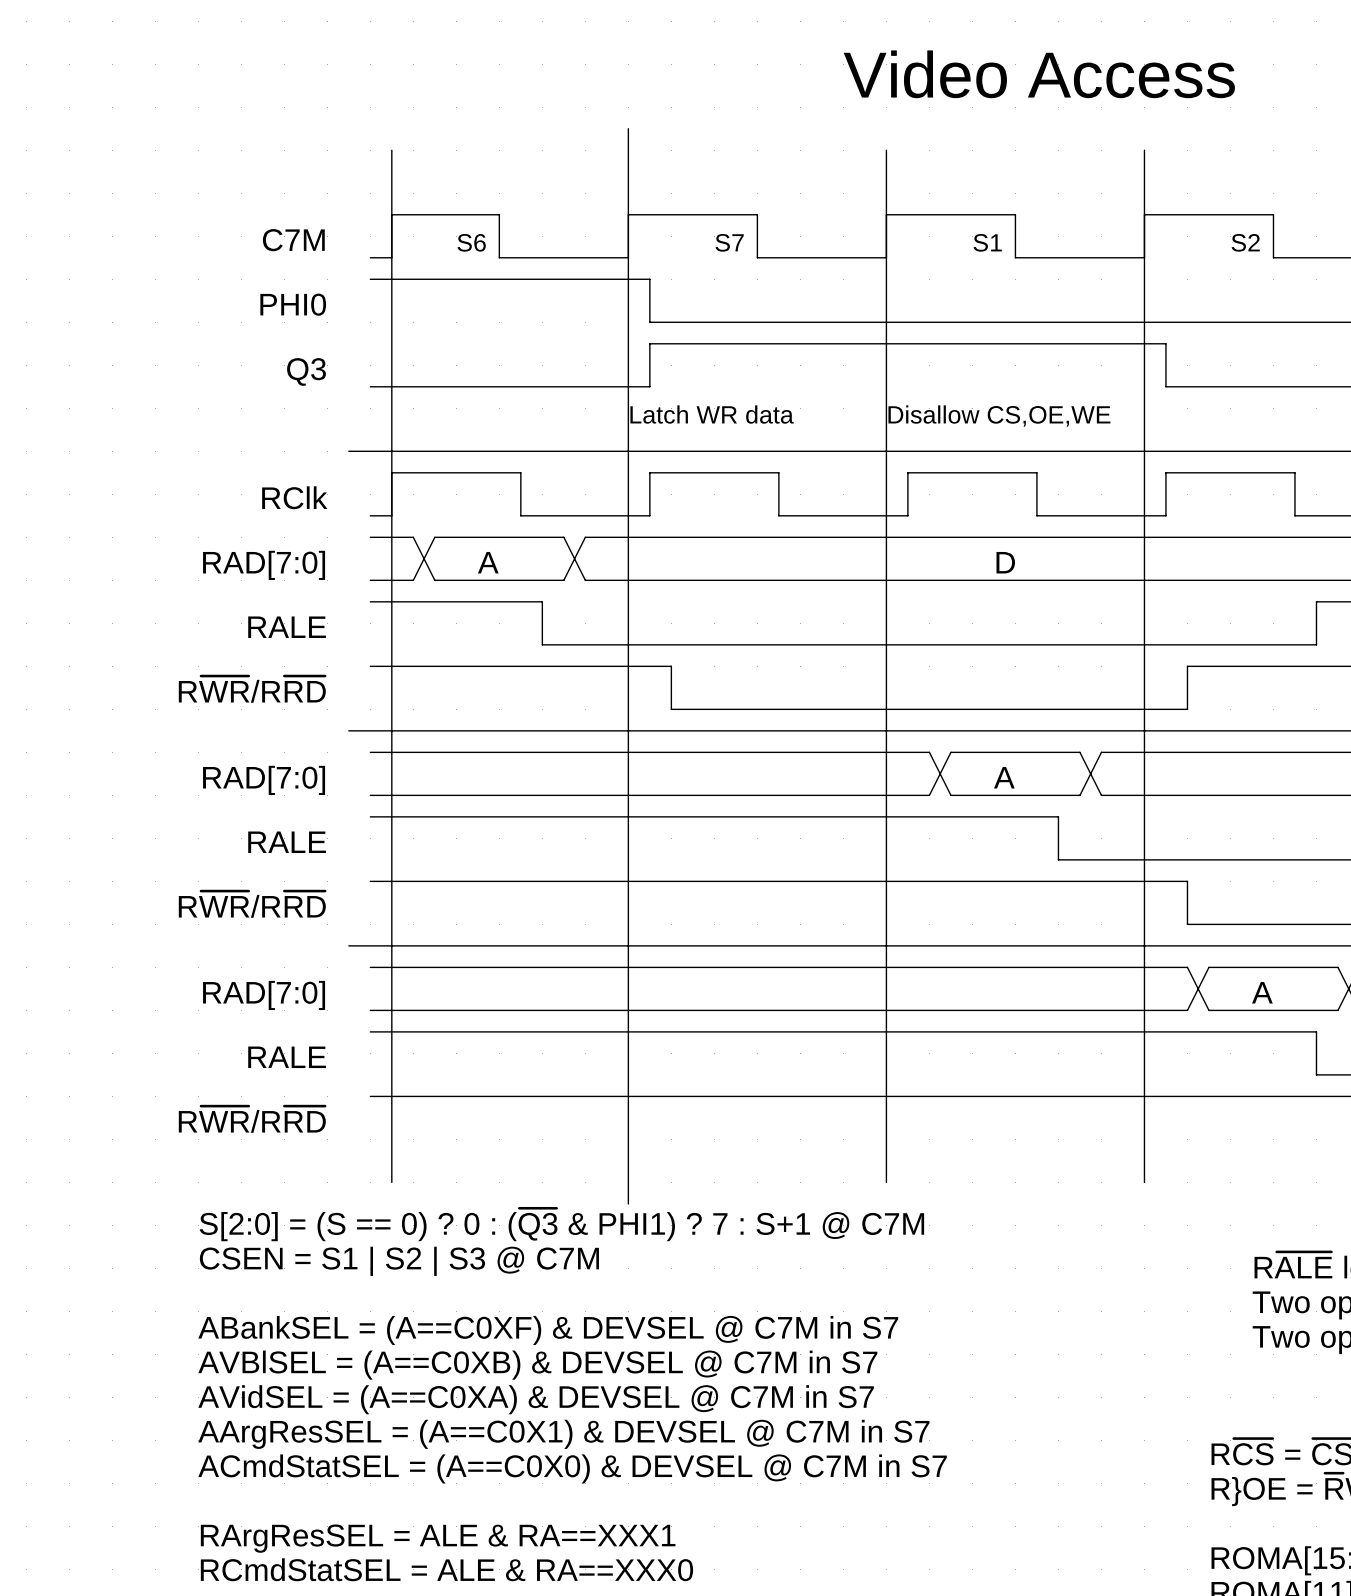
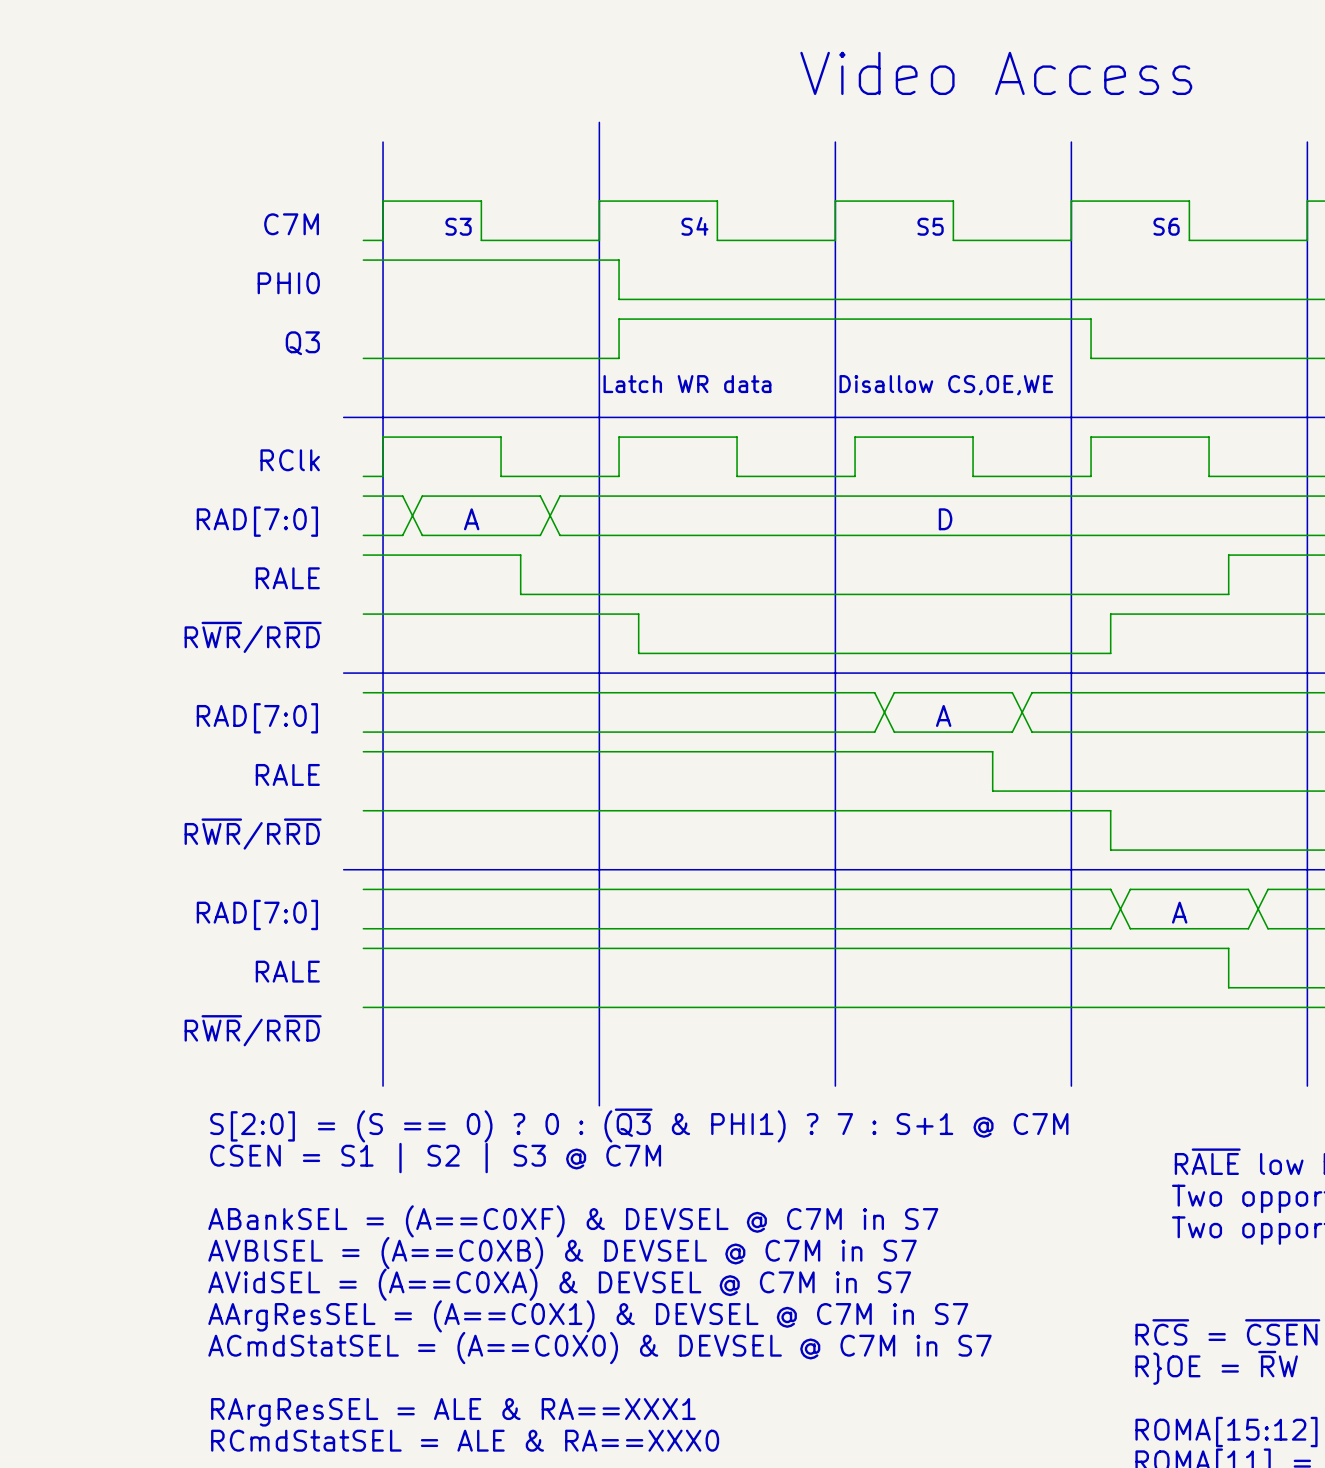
text: S6 (471, 242) -> S3 (458, 226)
text: S7 (729, 242) -> S4 (694, 226)
text: S1 (987, 242) -> S5 (930, 226)
text: S2 (1245, 242) -> S6 (1166, 226)

